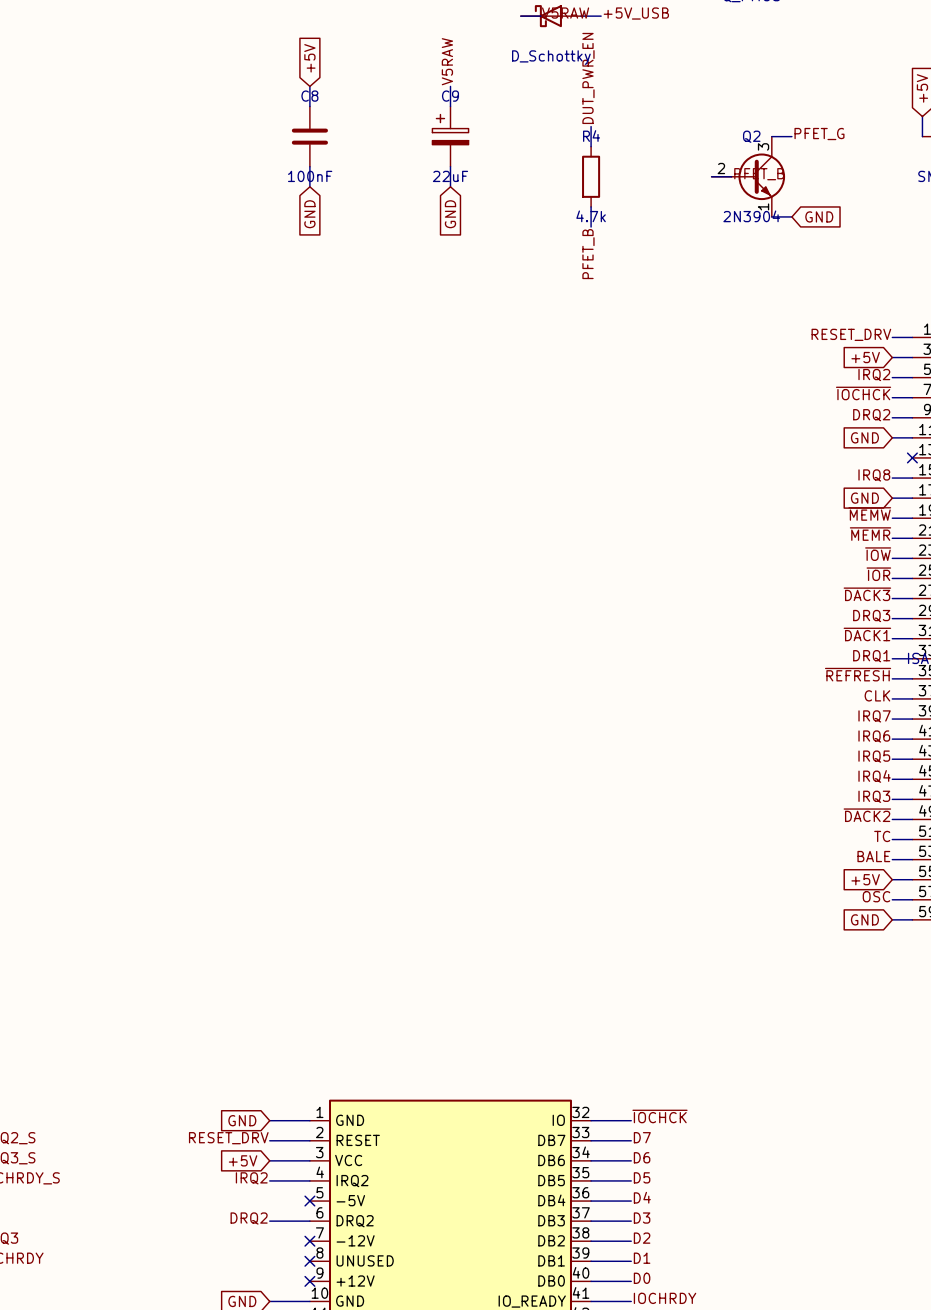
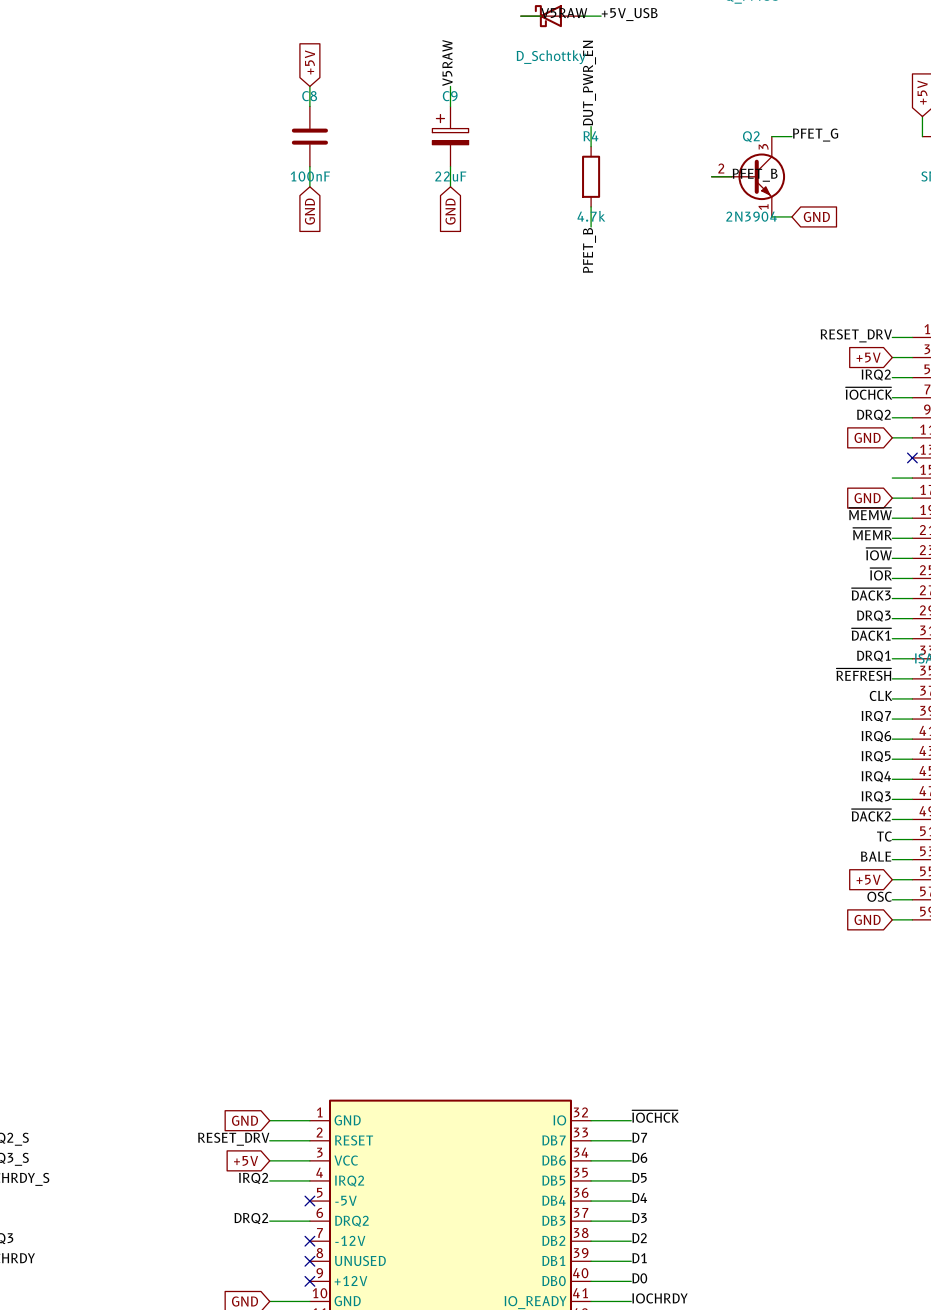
label: IRQ8 (874, 475) -> none

